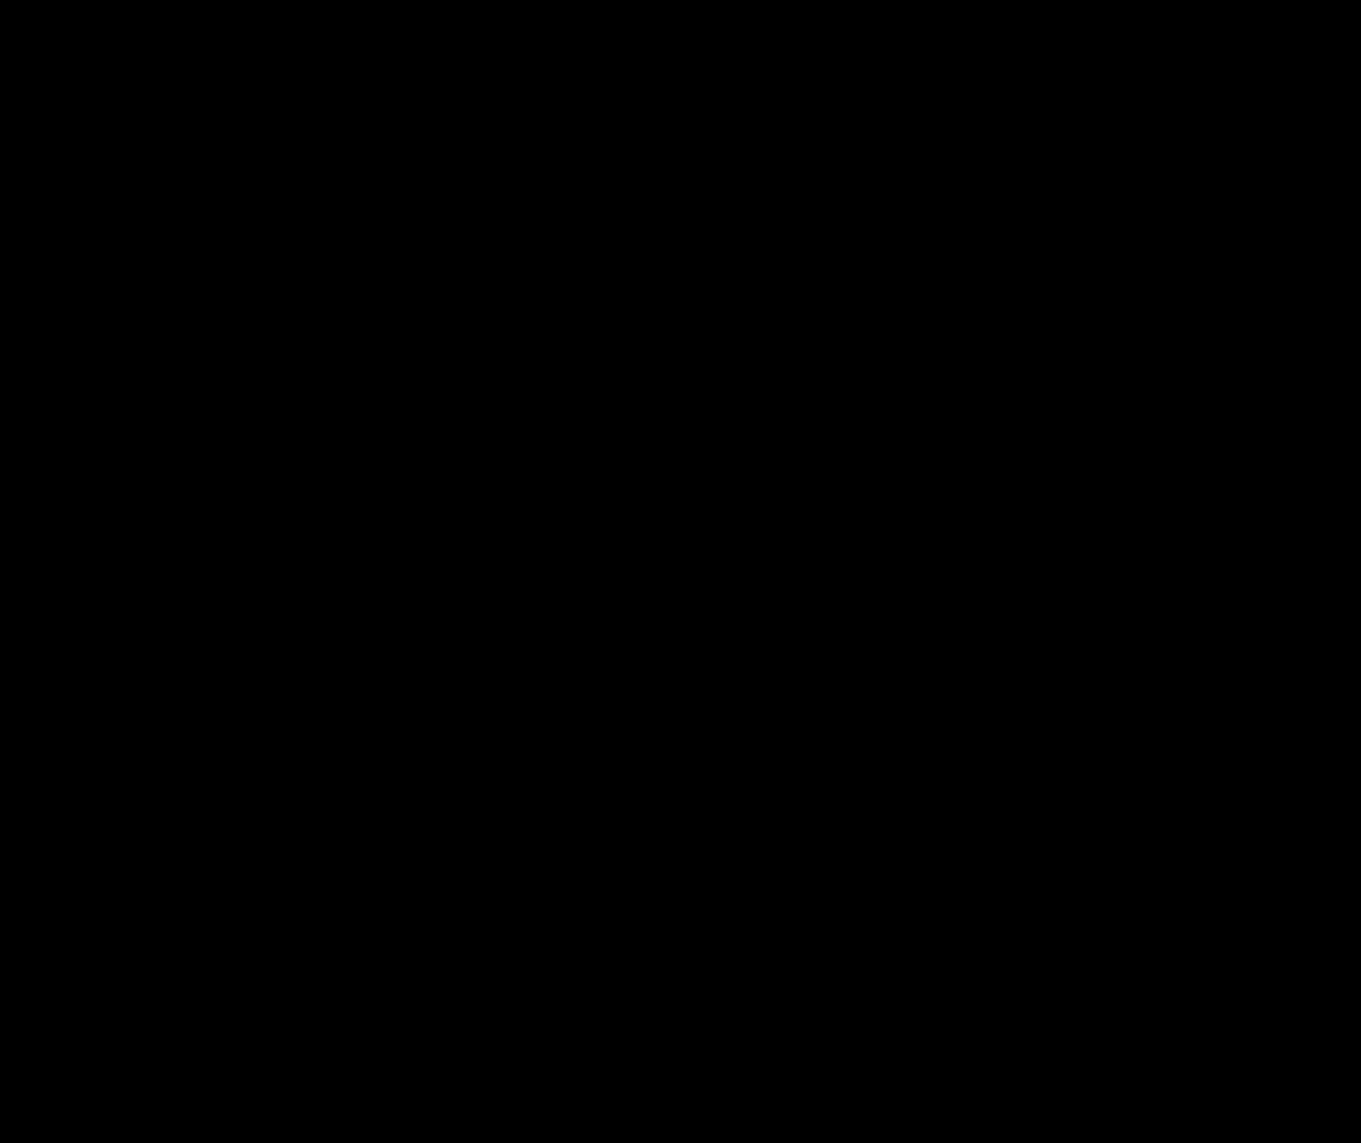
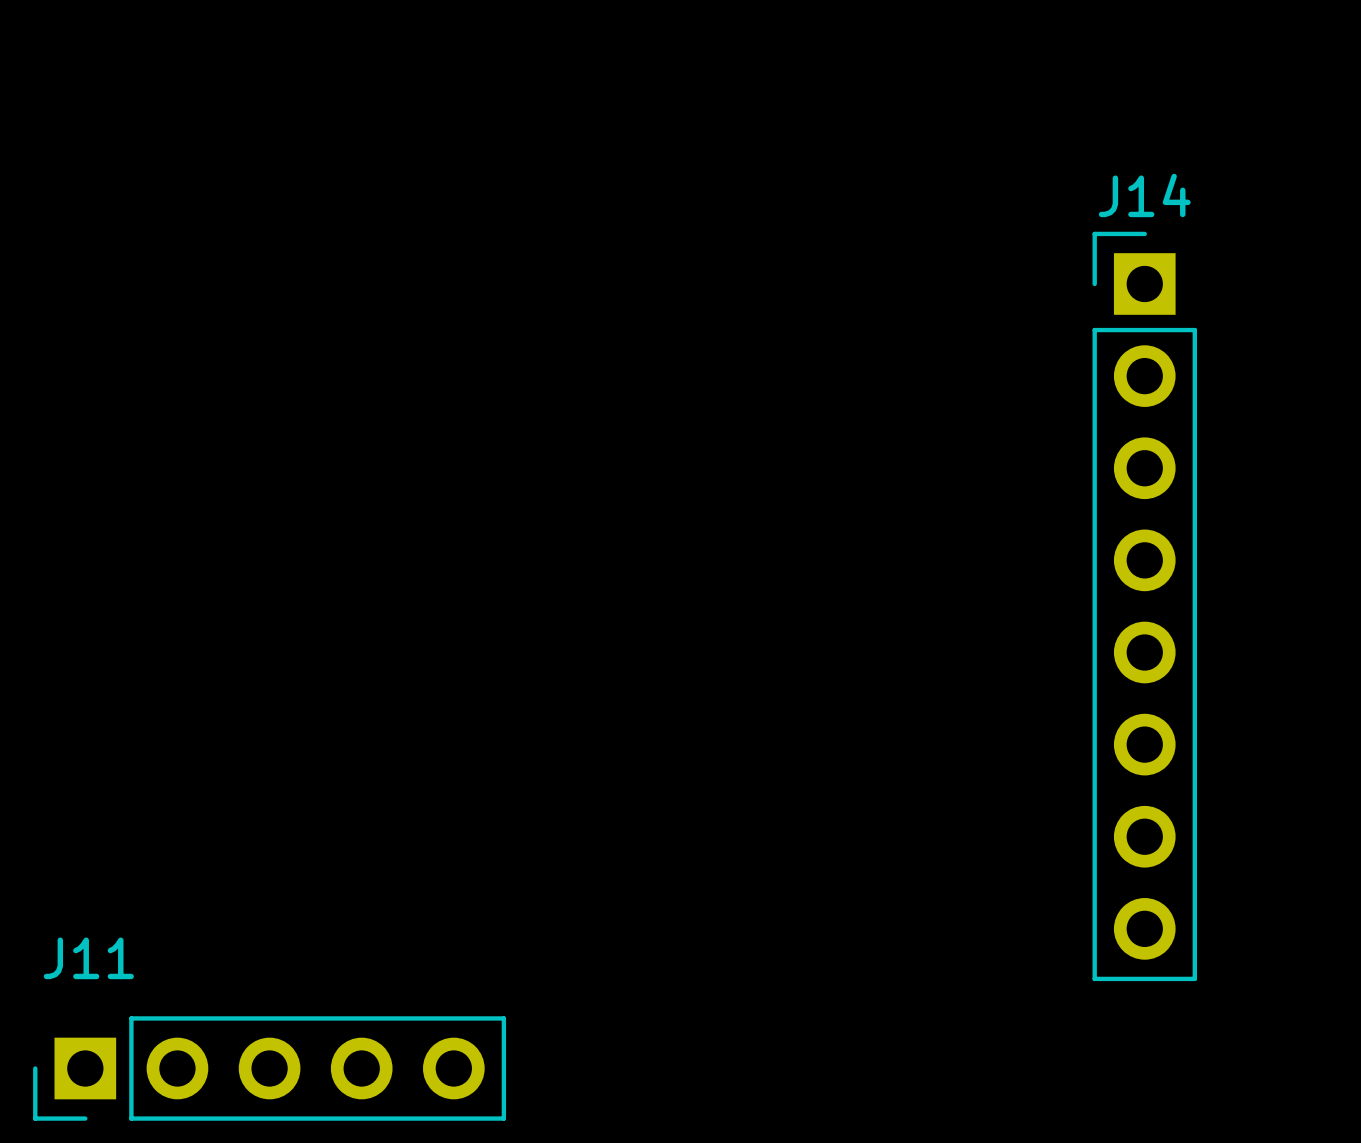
J14: none -> (1144, 606)
J11: none -> (269, 1068)

